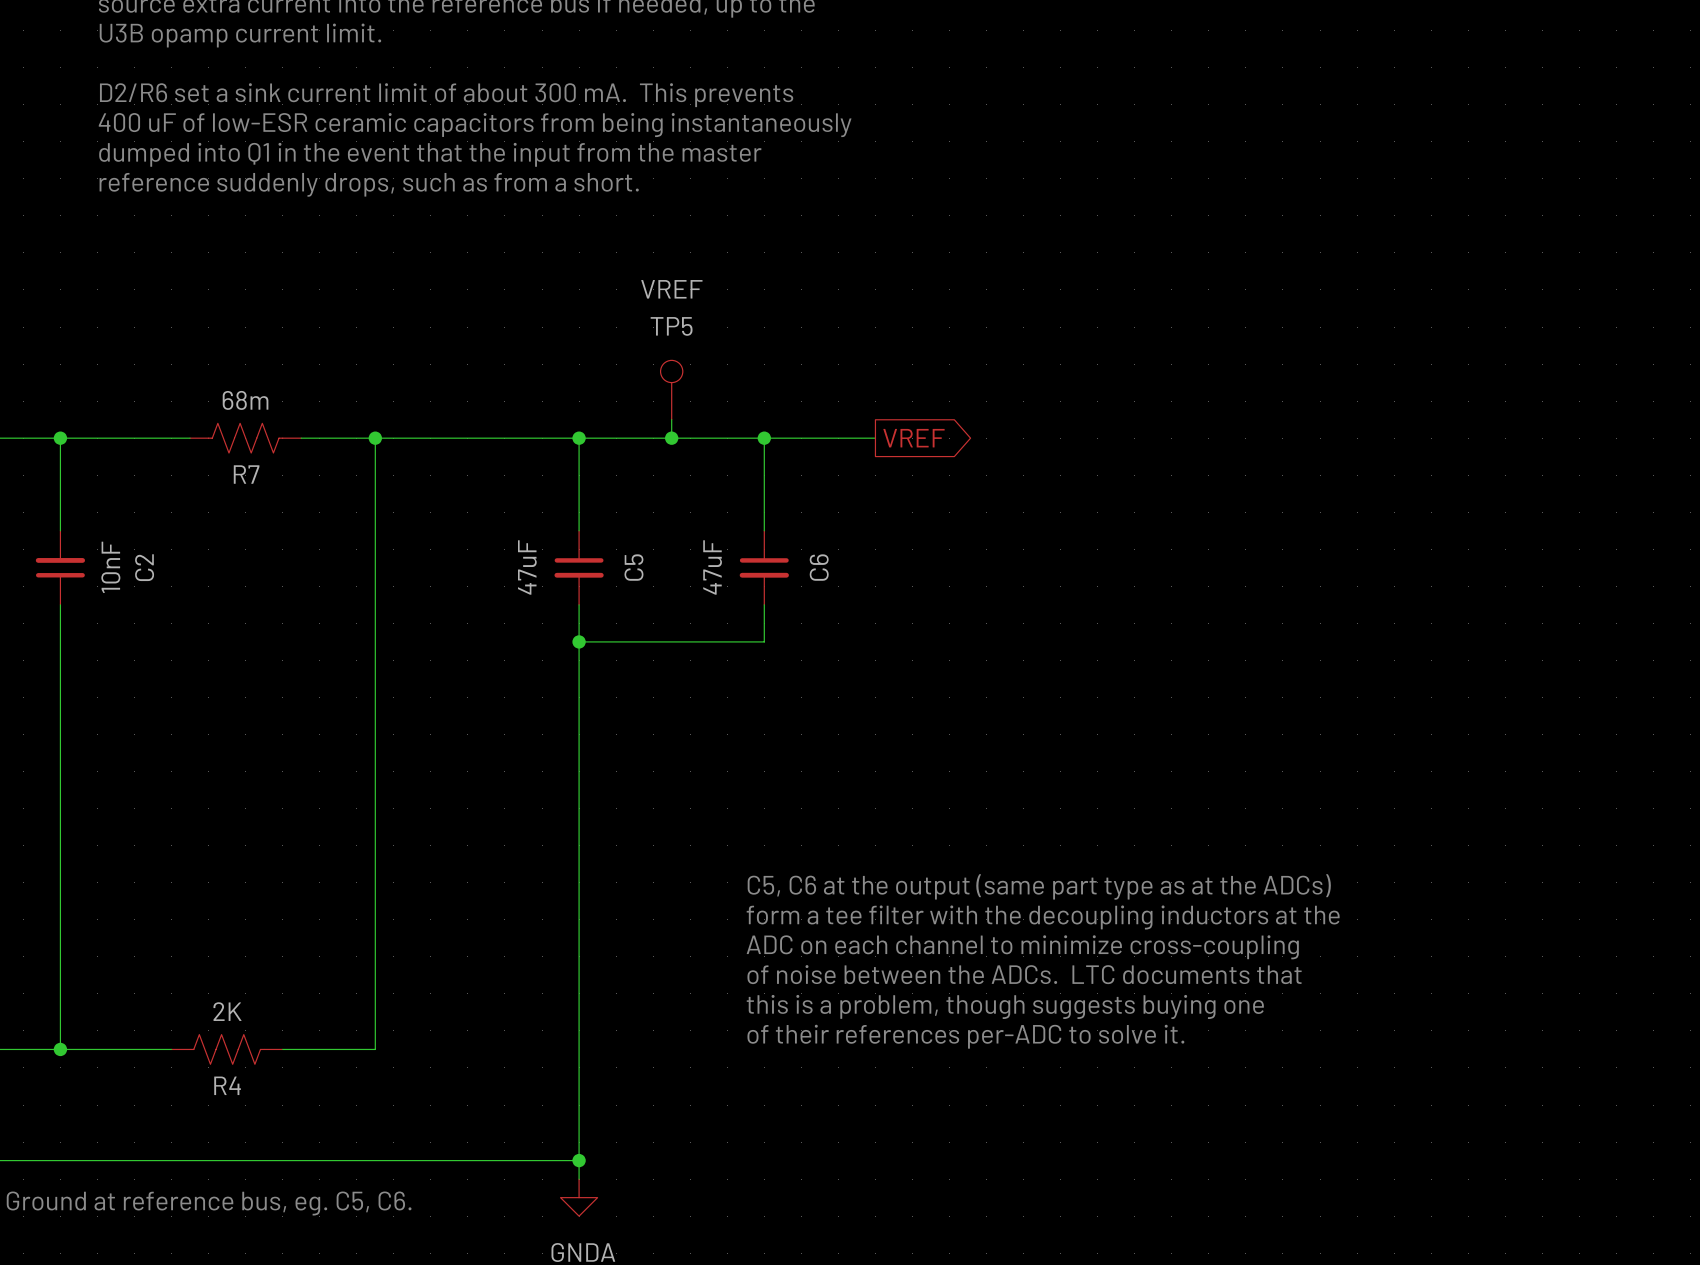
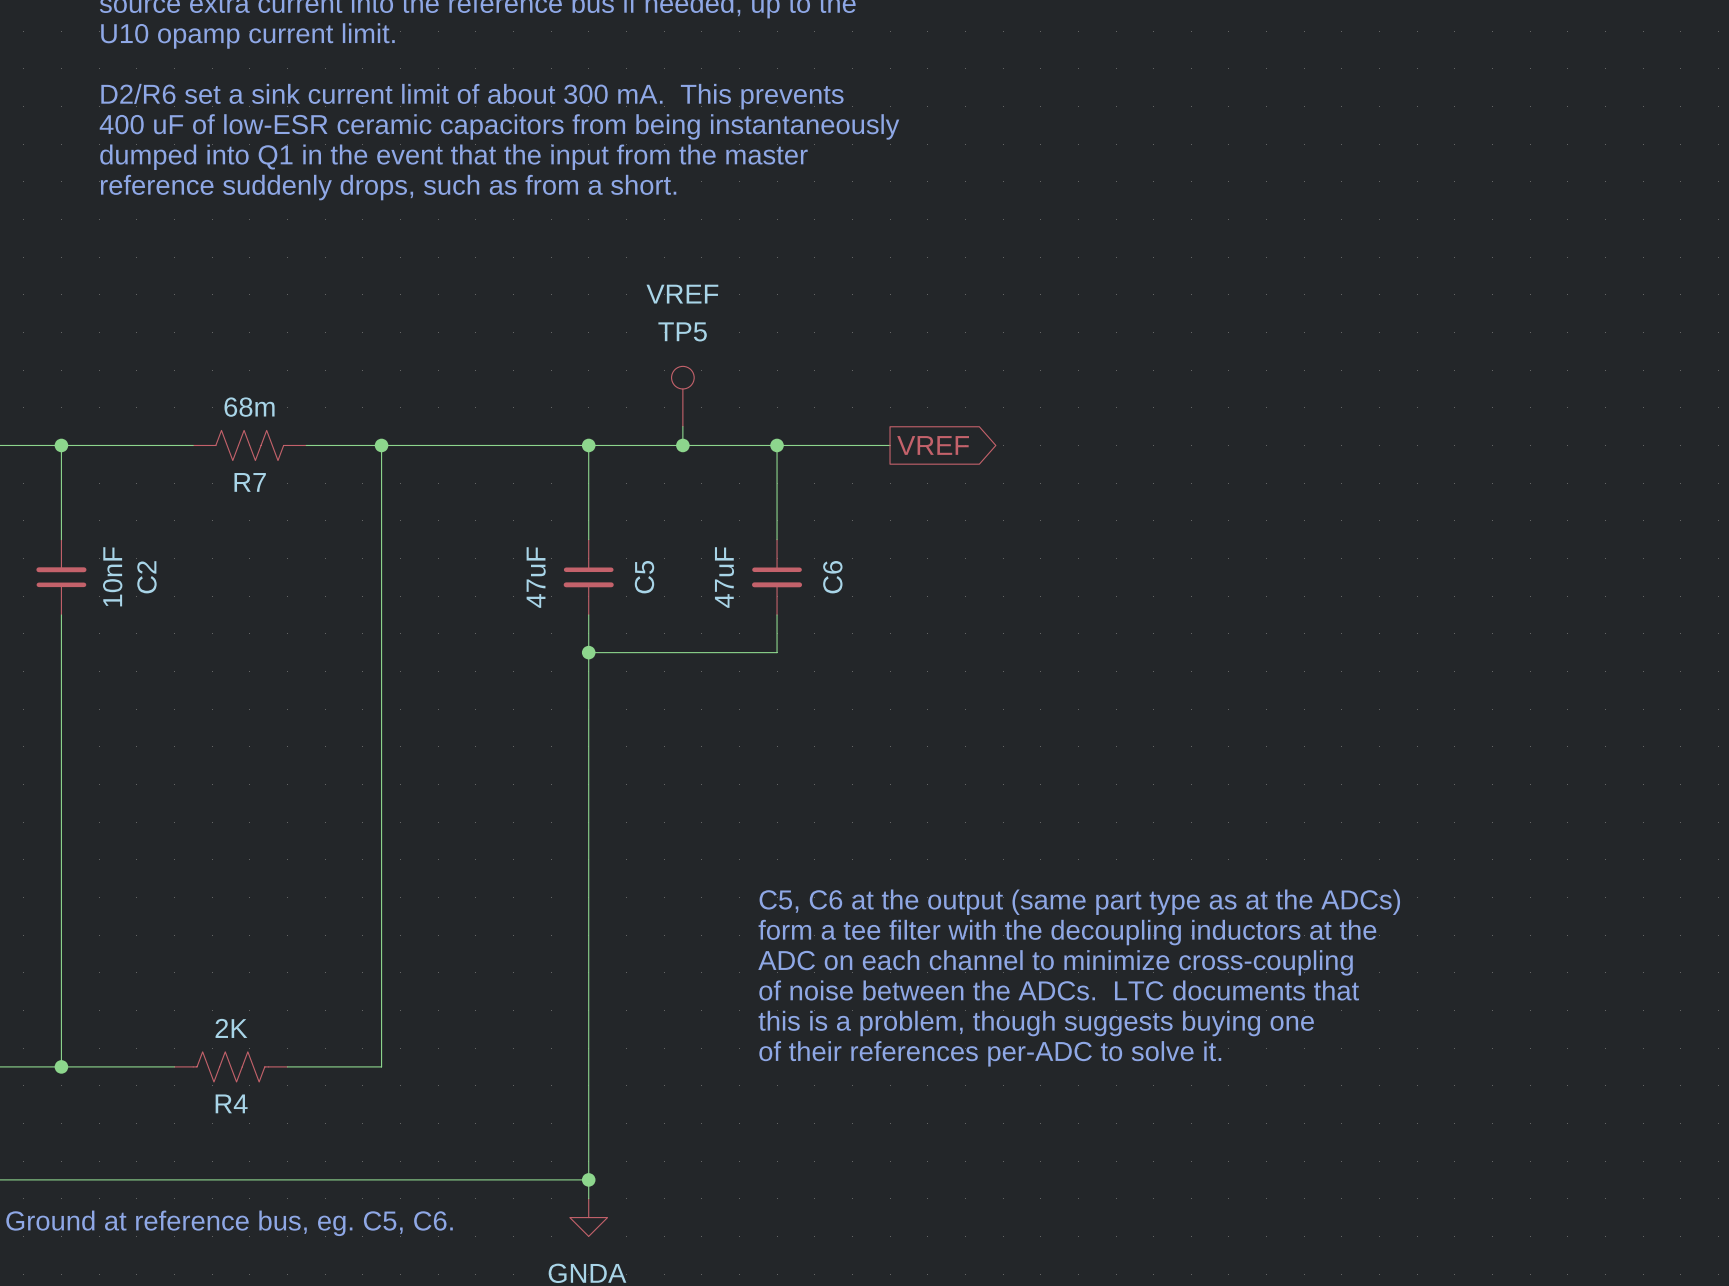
text: U3B opamp current limit. (240, 35) -> U10 opamp current limit. (247, 35)

